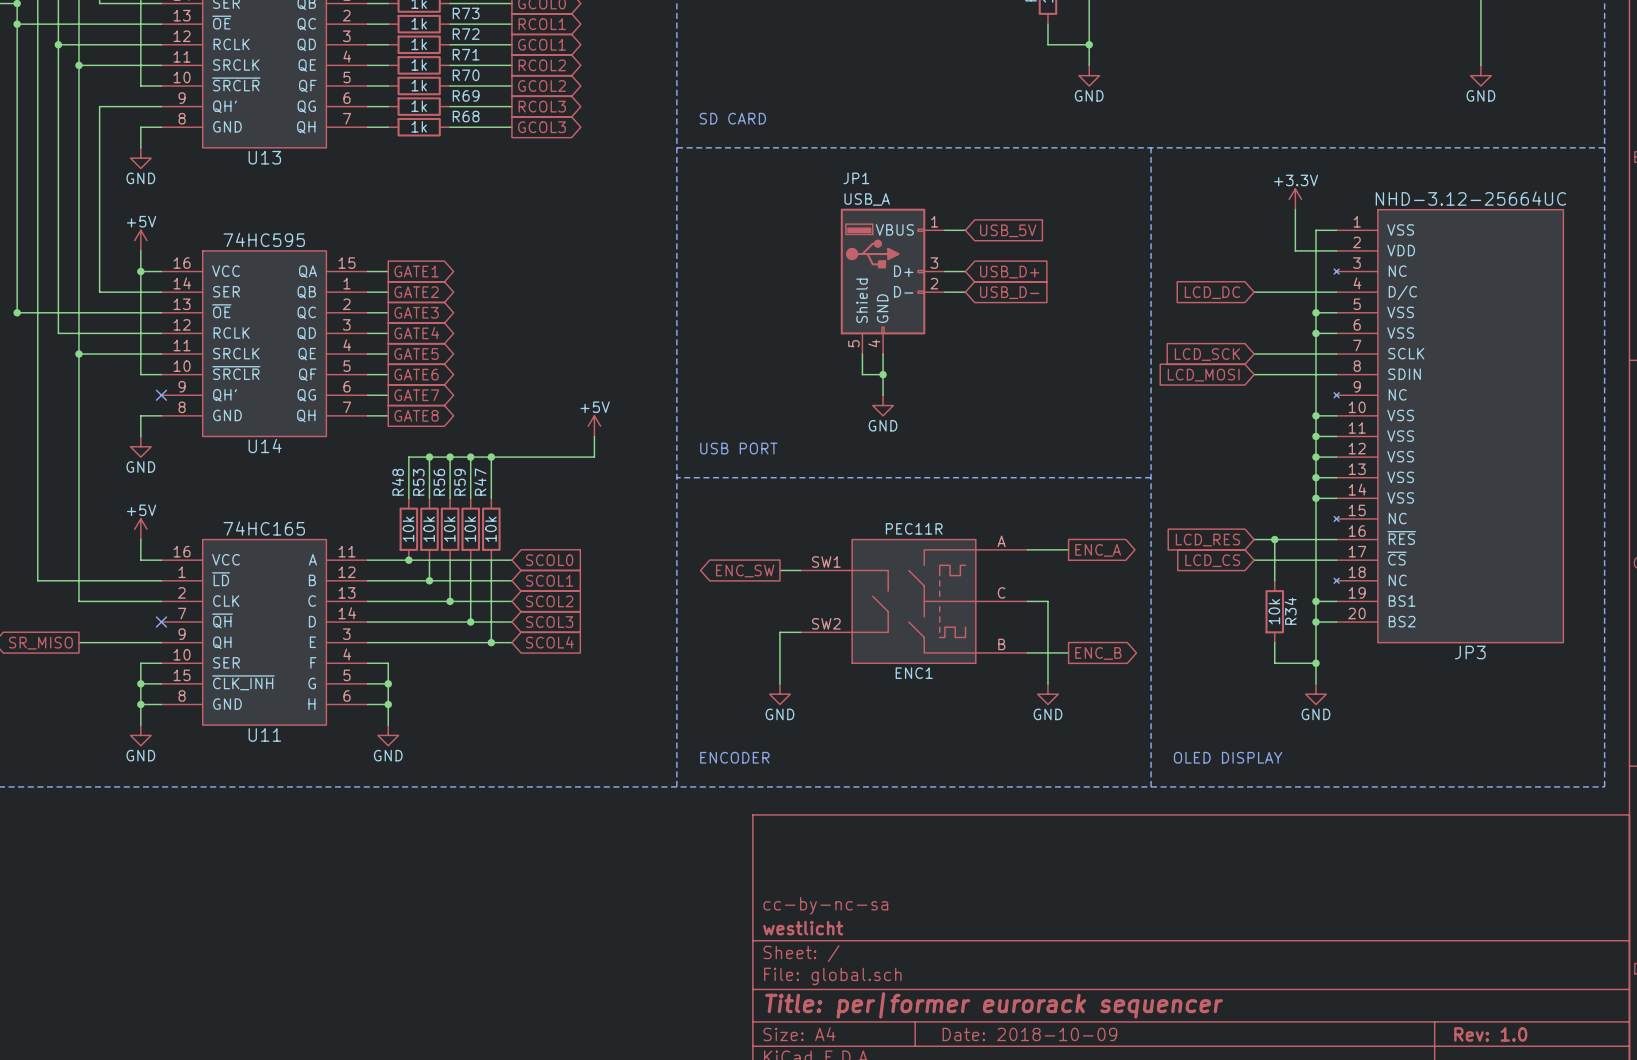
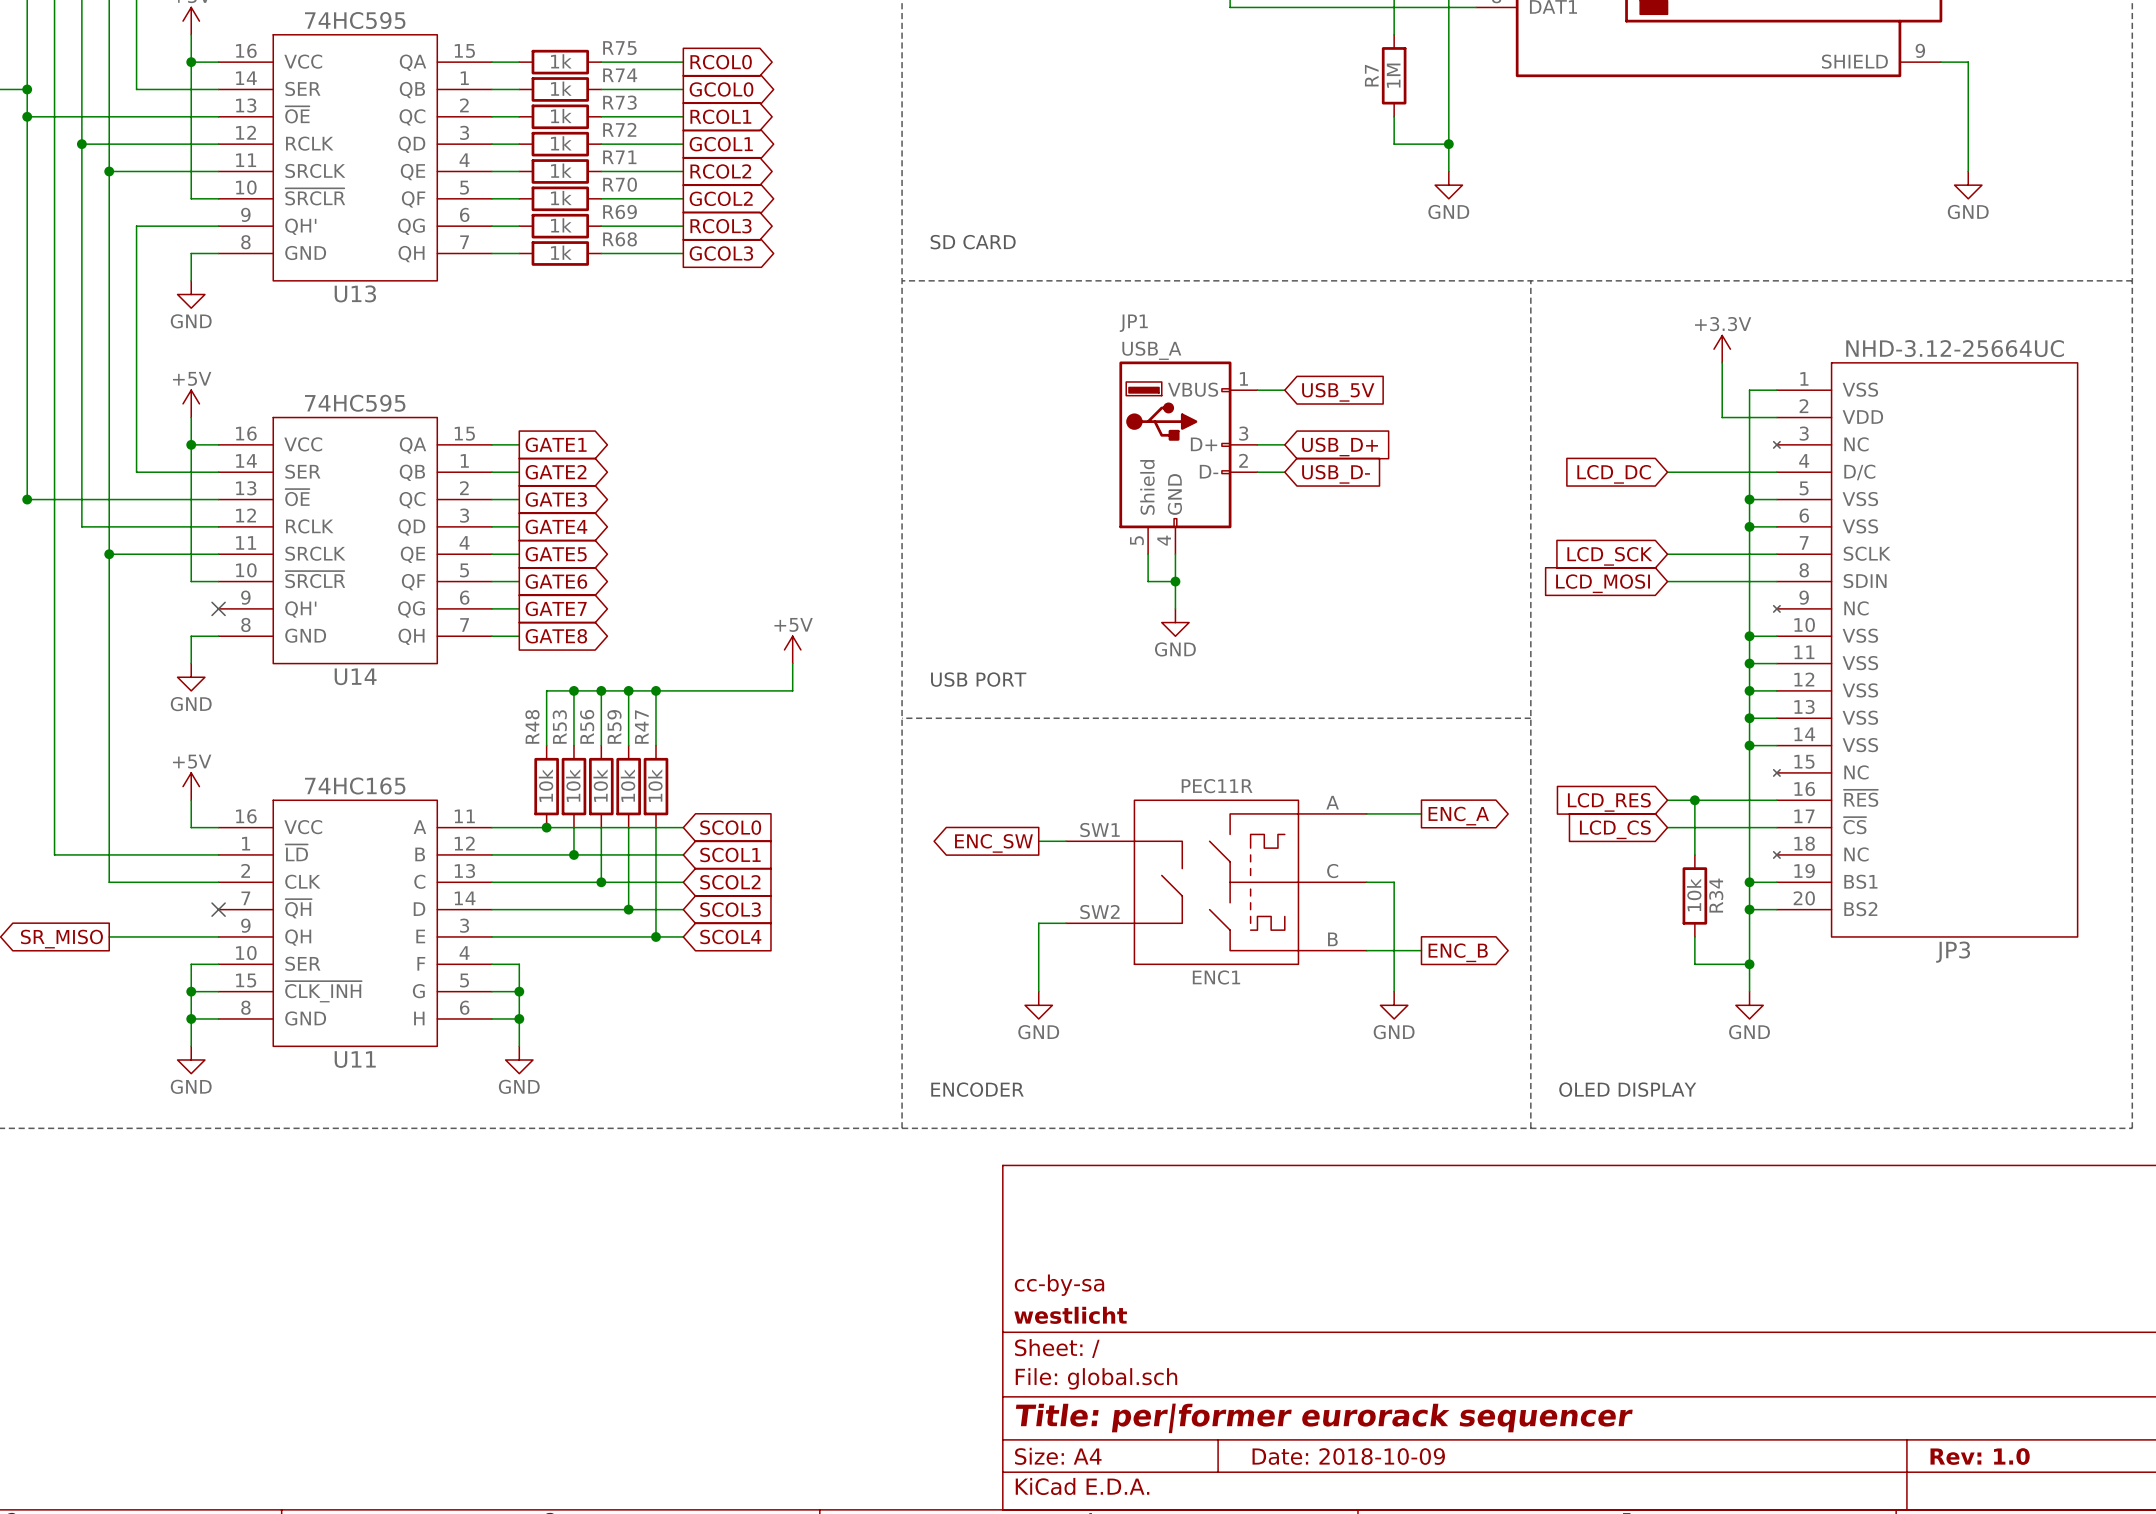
title block: cc-by-nc-sa (825, 905) -> cc-by-sa (1059, 1285)

